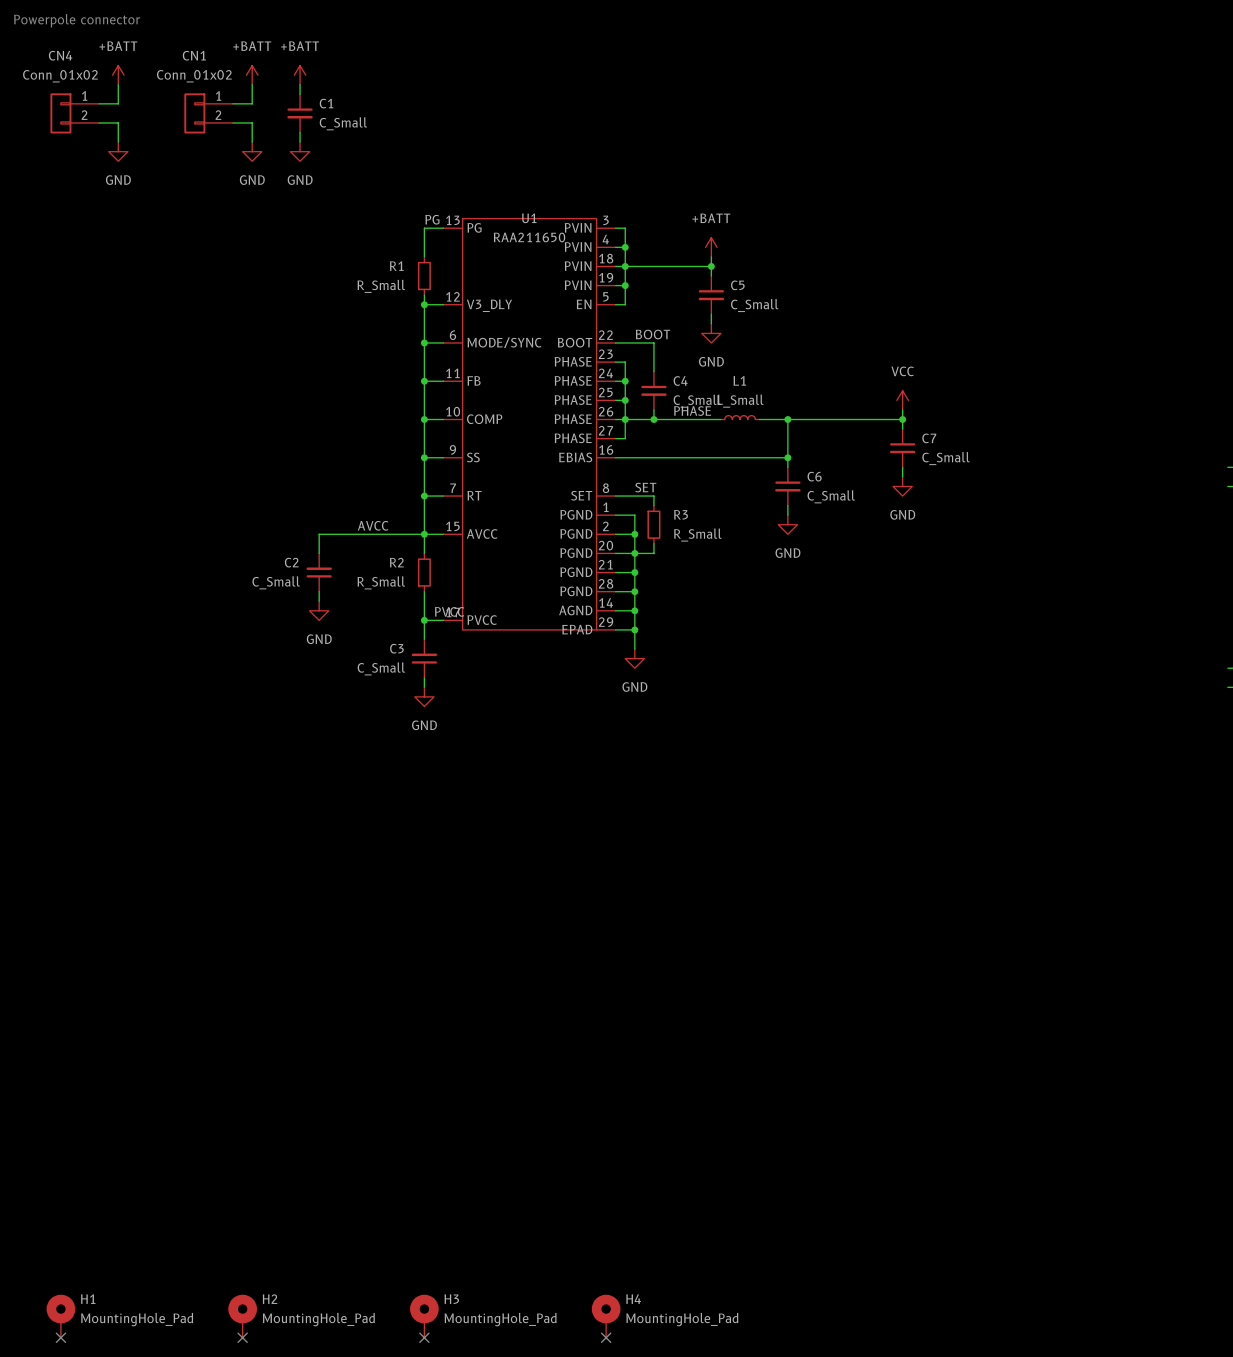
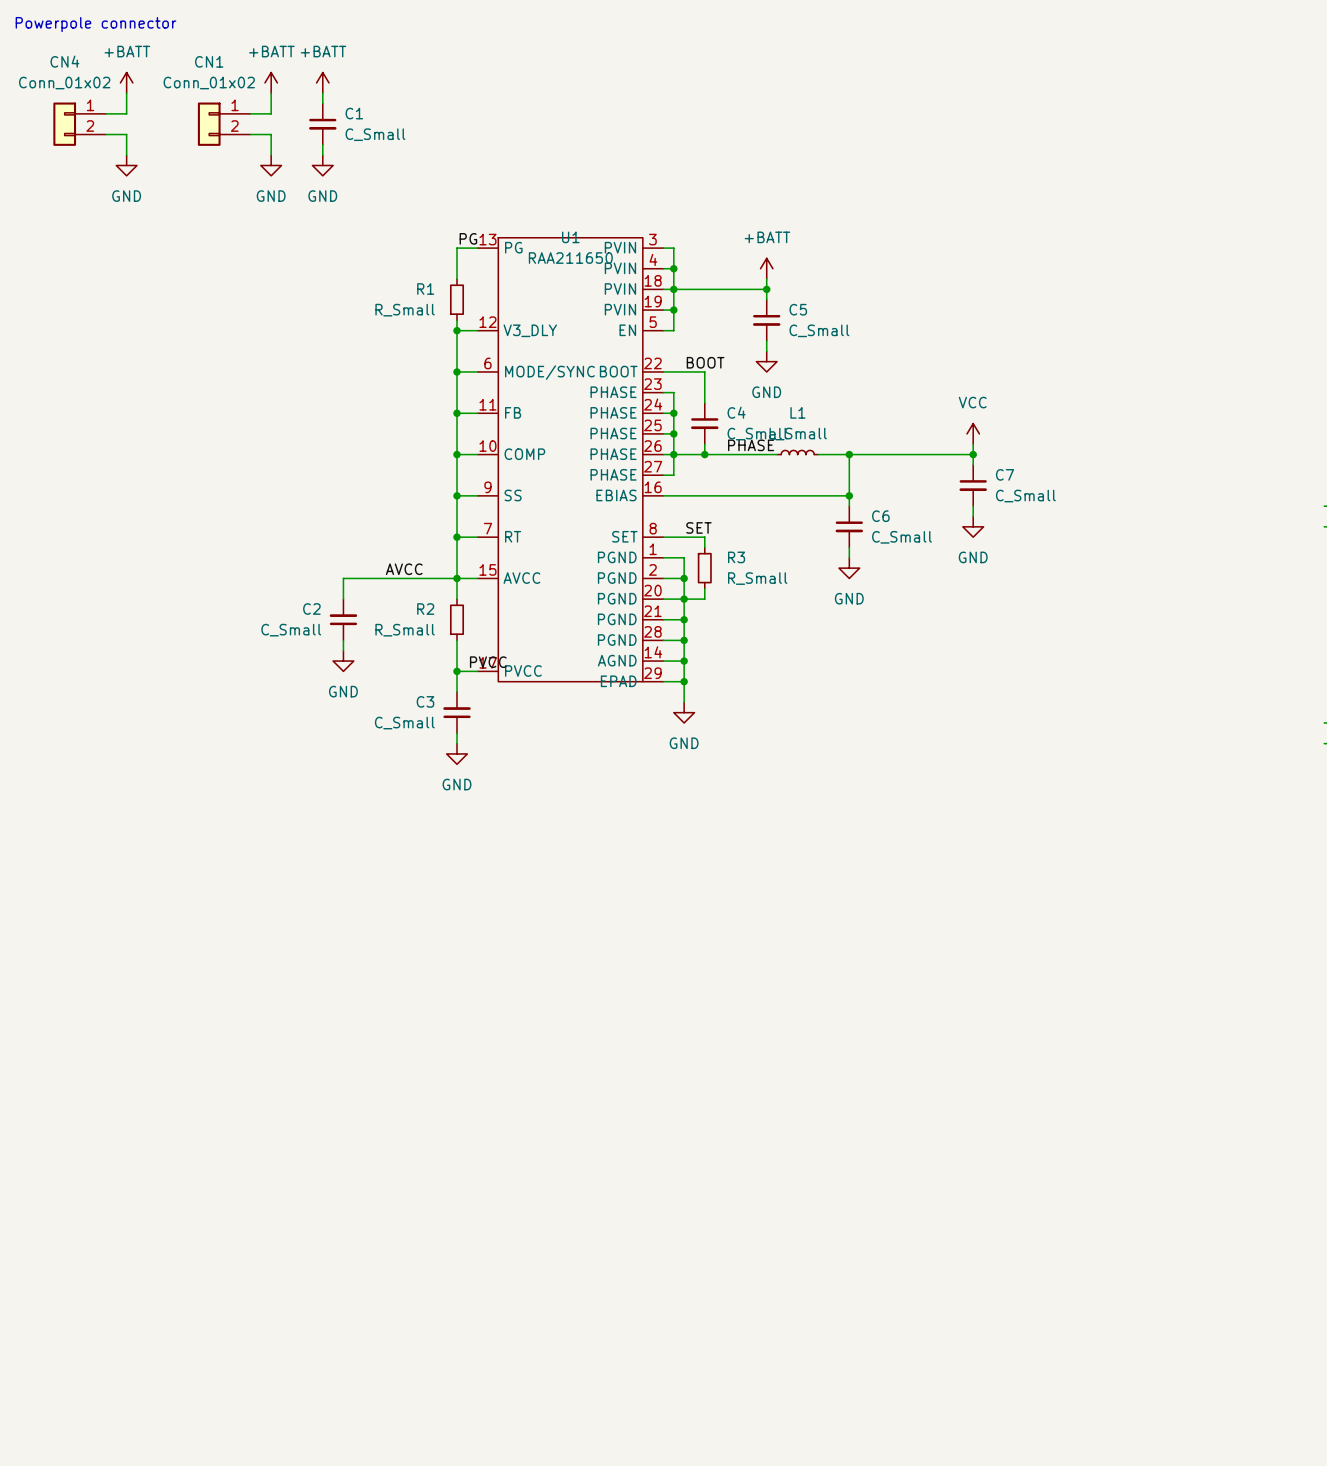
H1: MountingHole_Pad (60, 1316) -> none
H2: MountingHole_Pad (242, 1316) -> none
H3: MountingHole_Pad (424, 1316) -> none
H4: MountingHole_Pad (606, 1316) -> none
no-connect mark: (60, 1337) -> none
no-connect mark: (242, 1337) -> none
no-connect mark: (424, 1337) -> none
no-connect mark: (606, 1337) -> none

